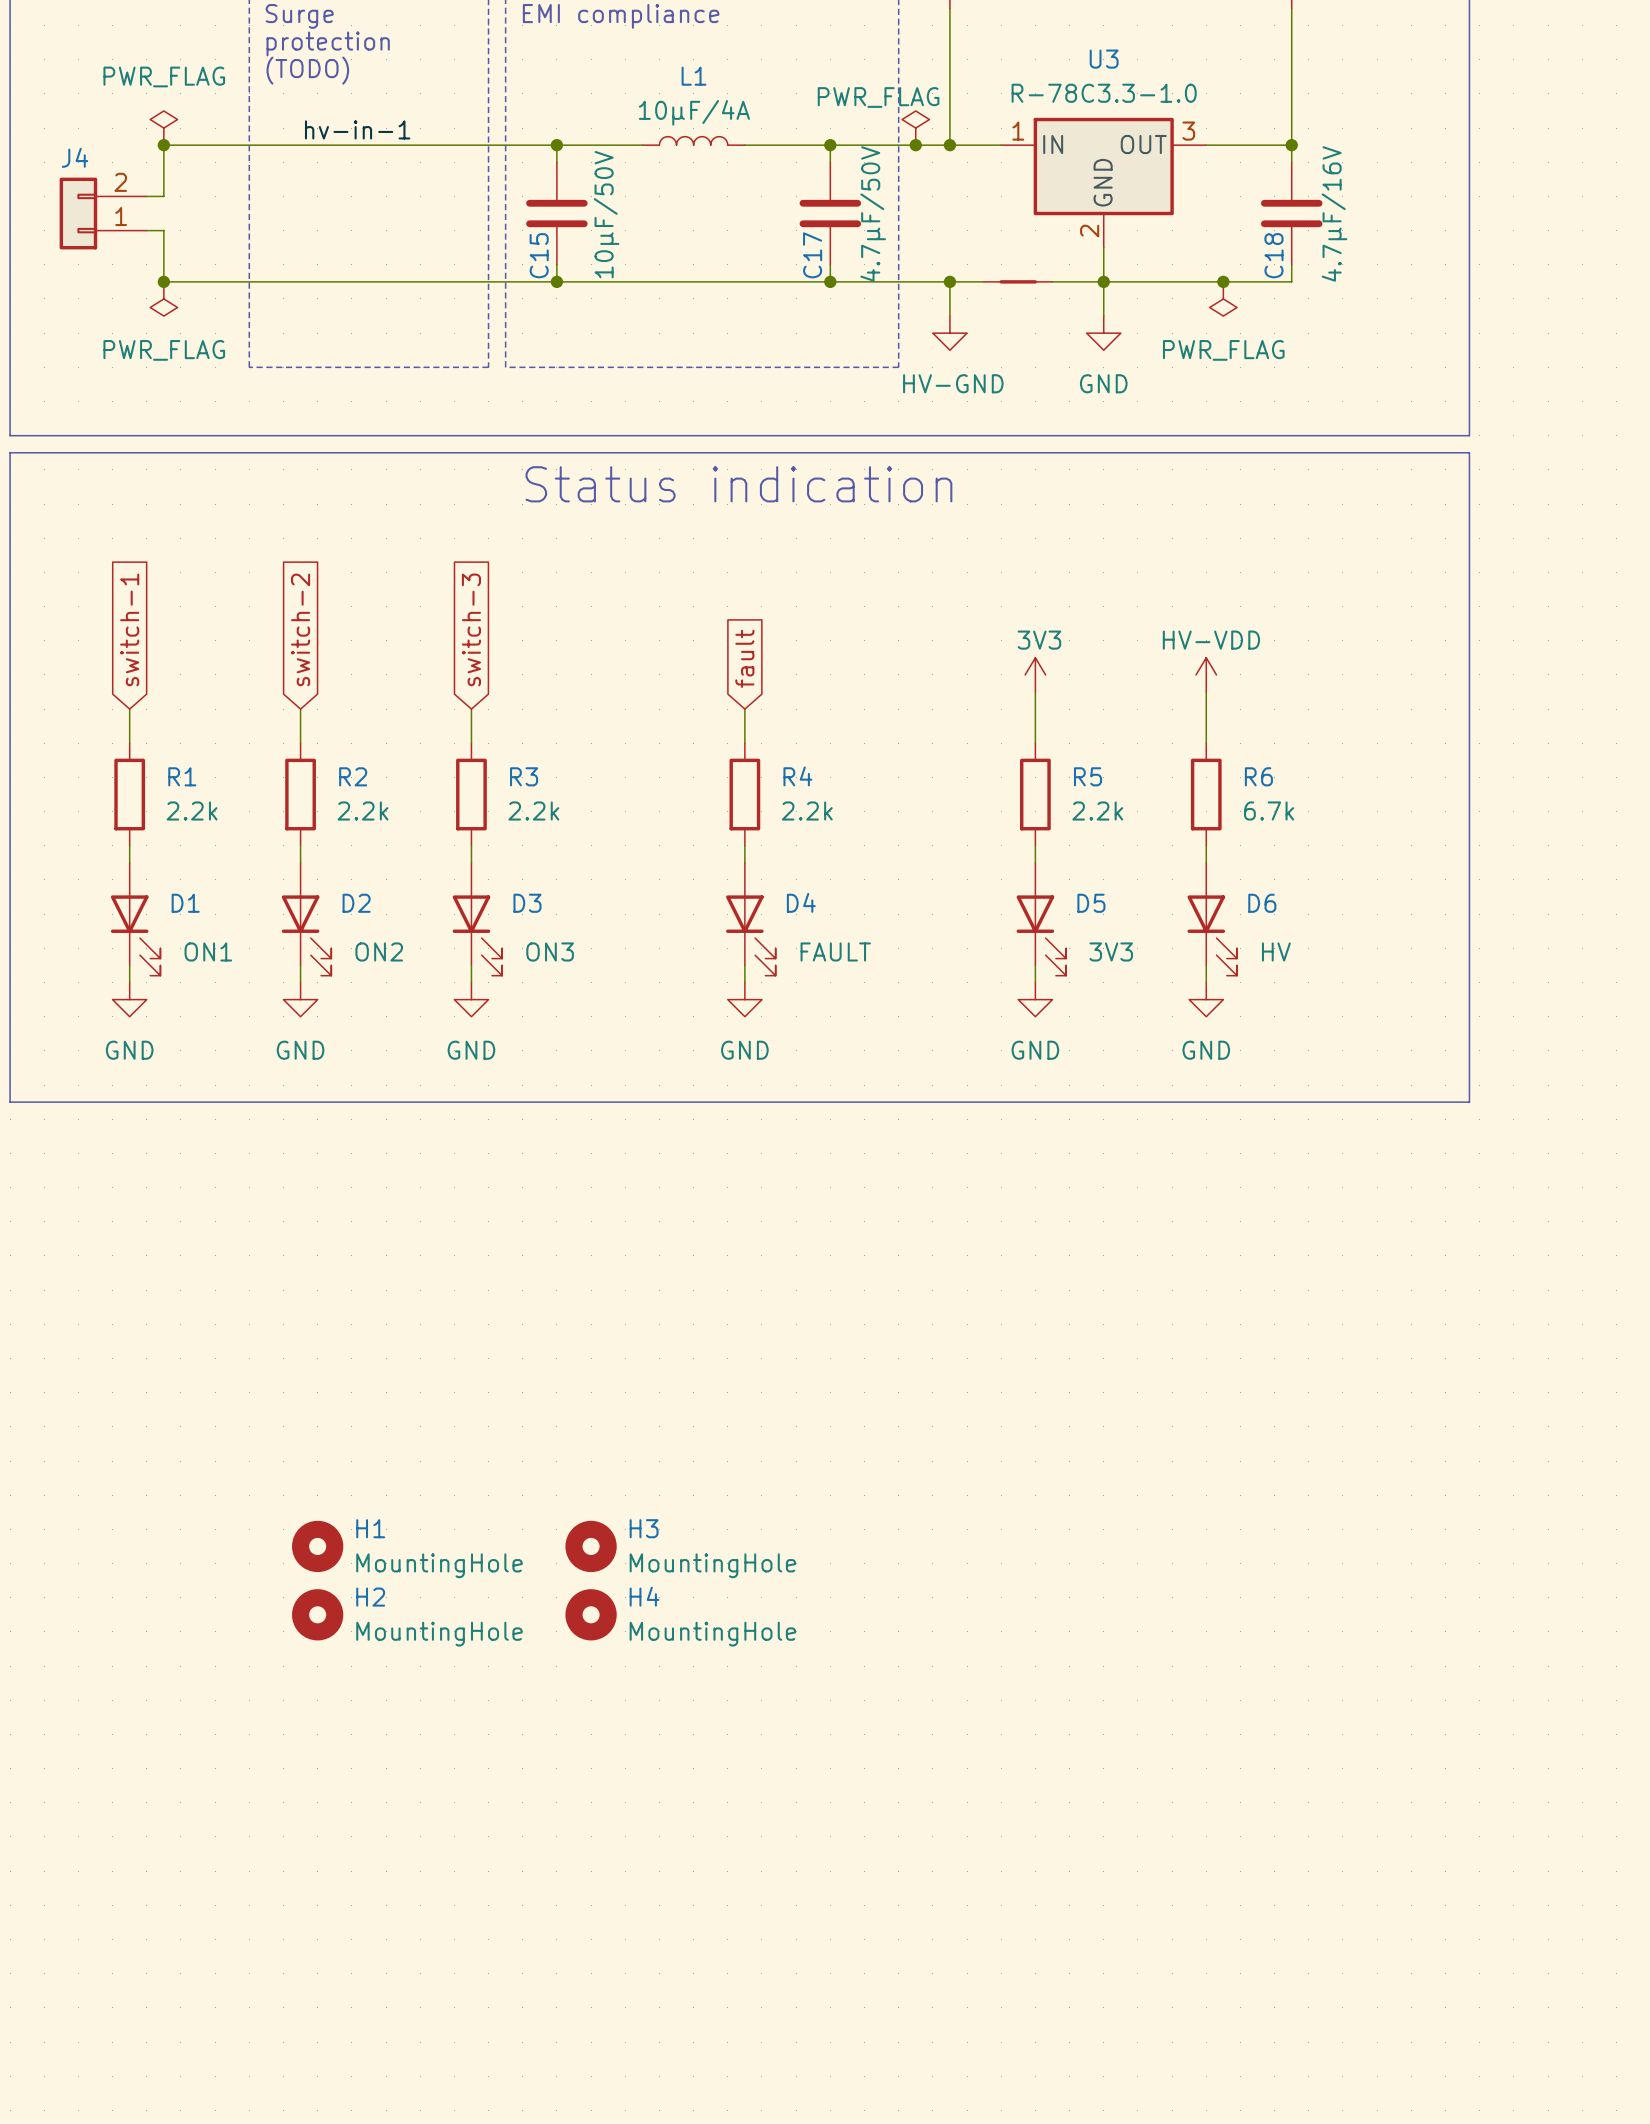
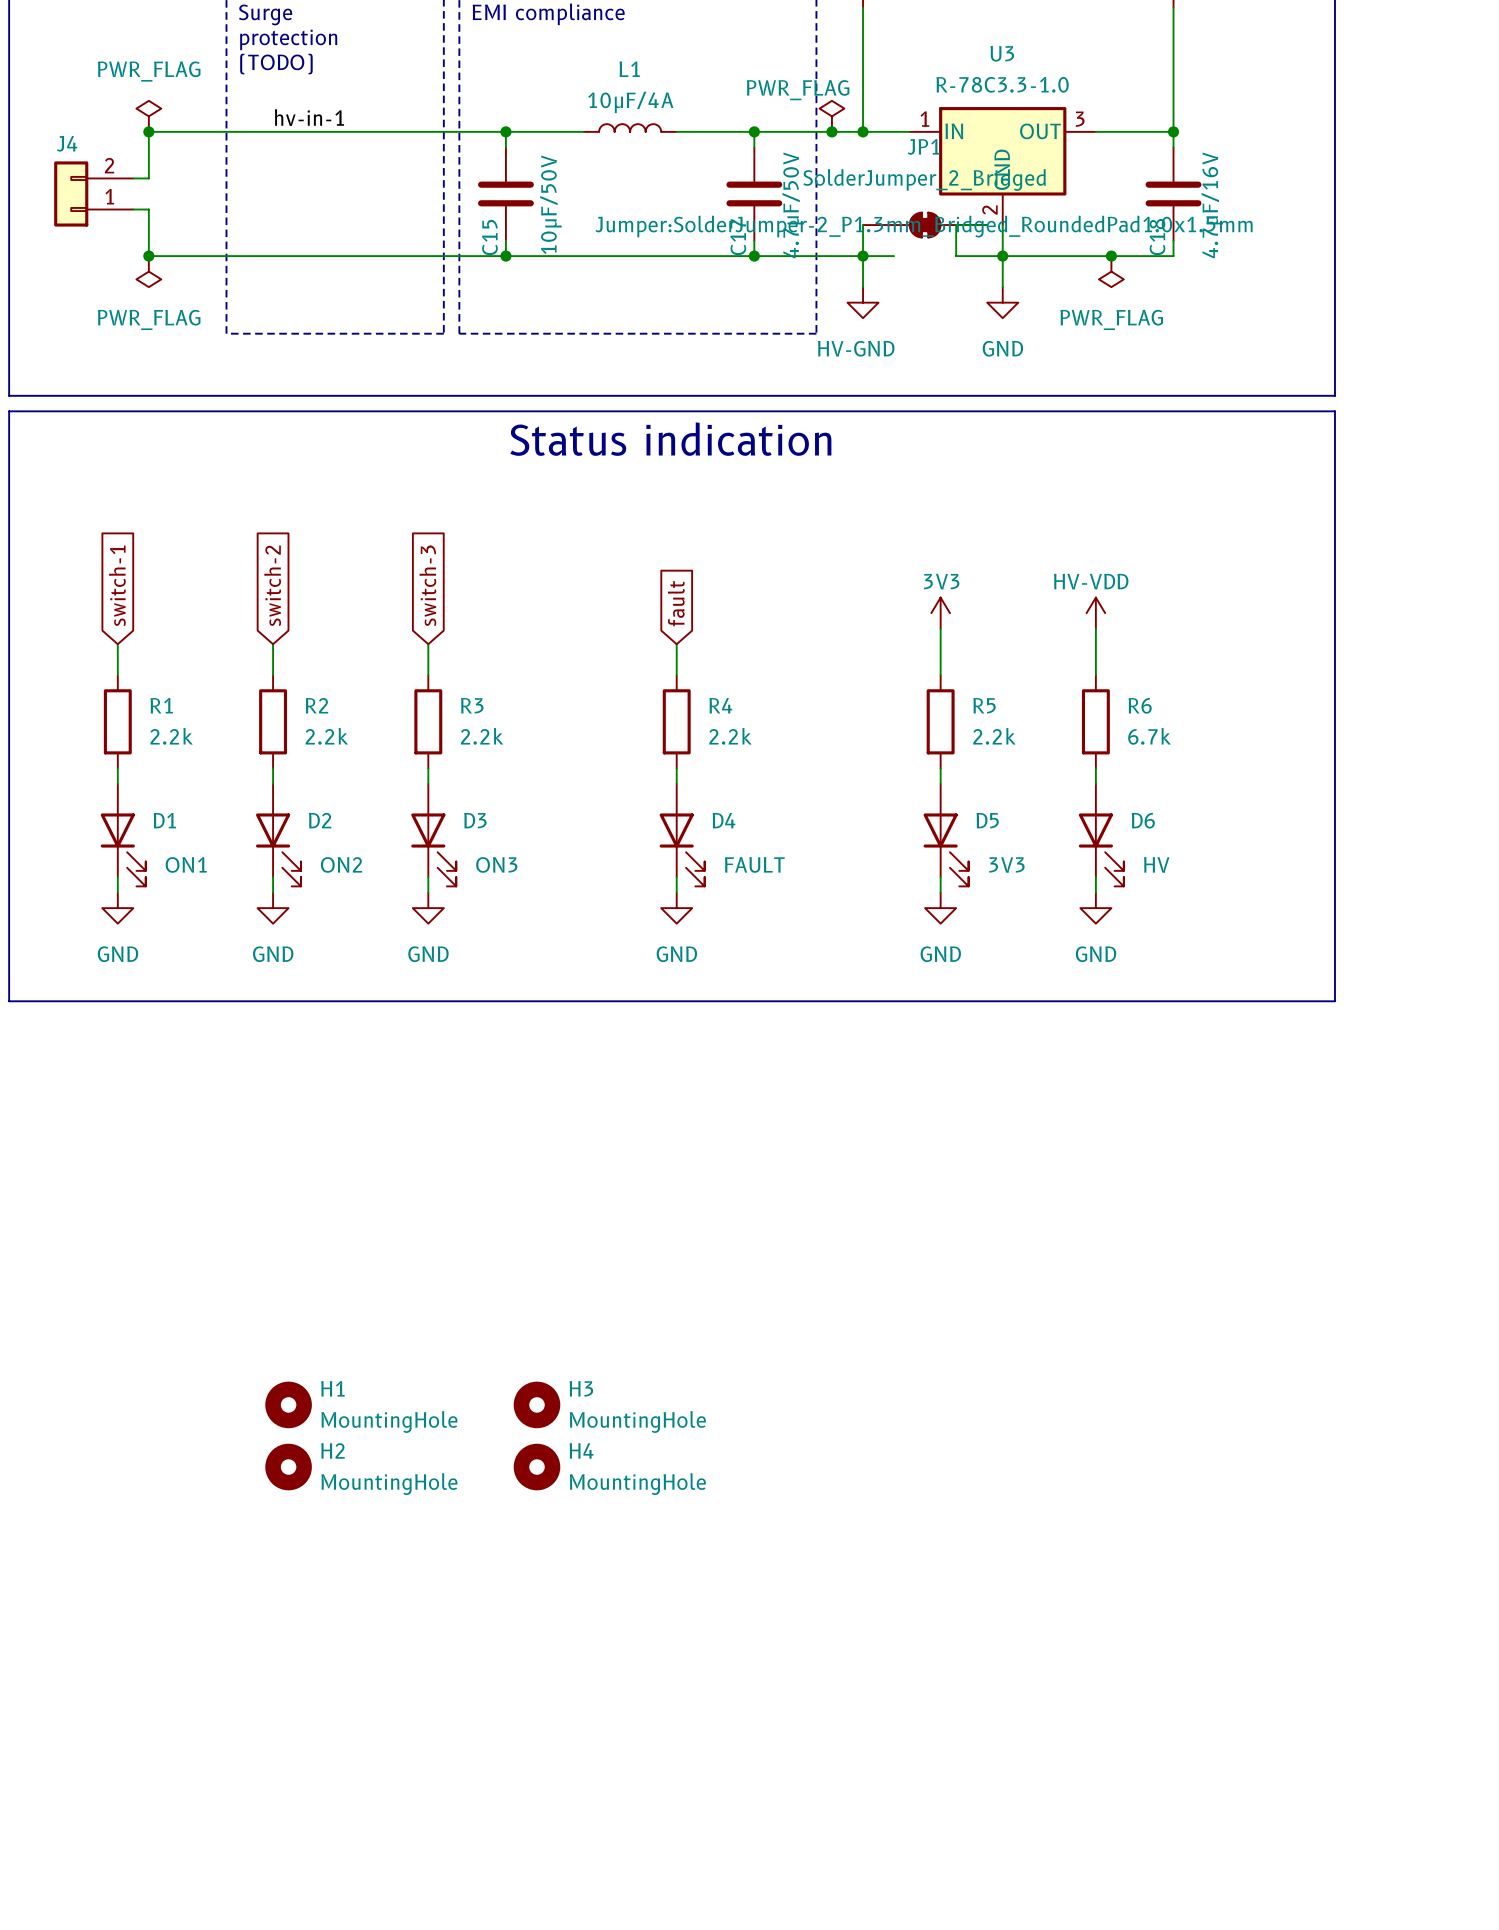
wire: none -> (863, 225) (863, 256)
JP1: none -> SolderJumper_2_Bridged (925, 225)
wire: none -> (987, 225) (956, 225) (956, 256)
part: (1018, 281) -> none

